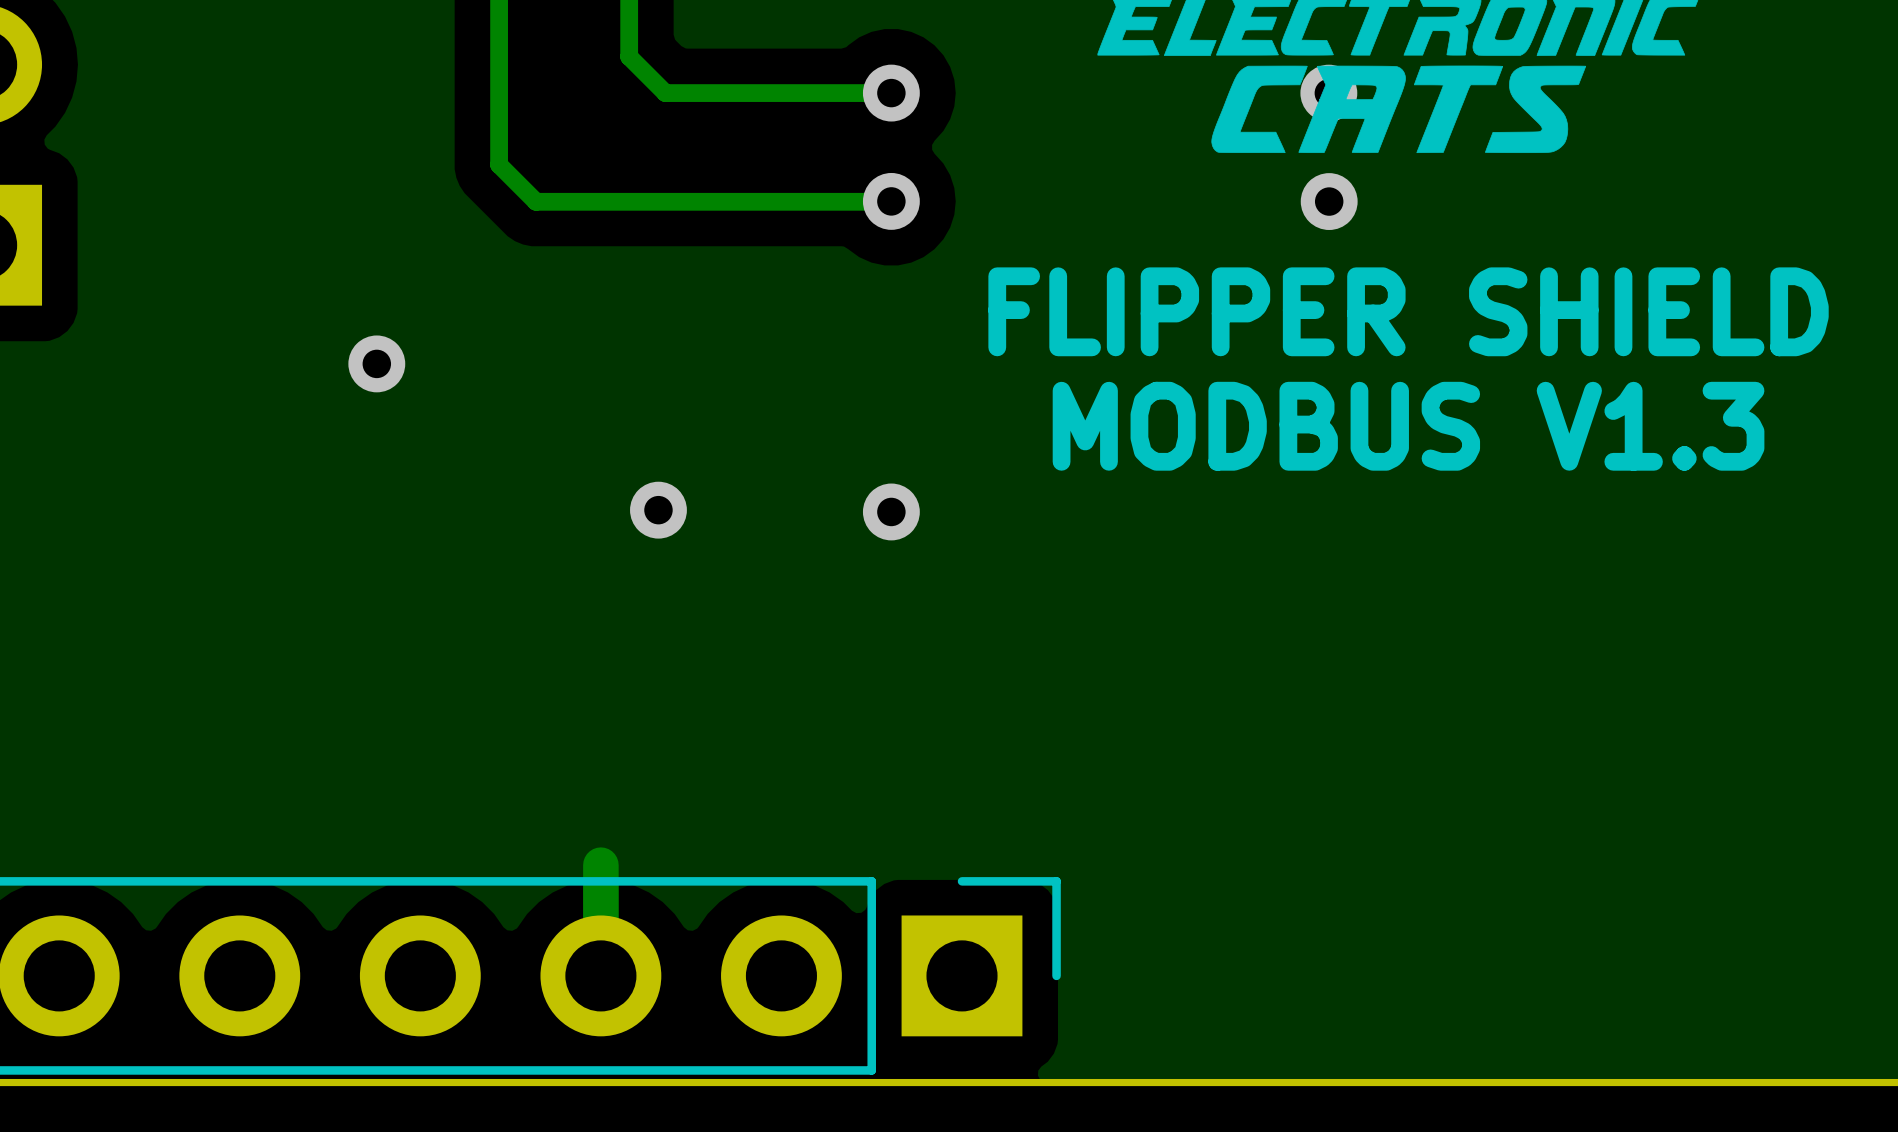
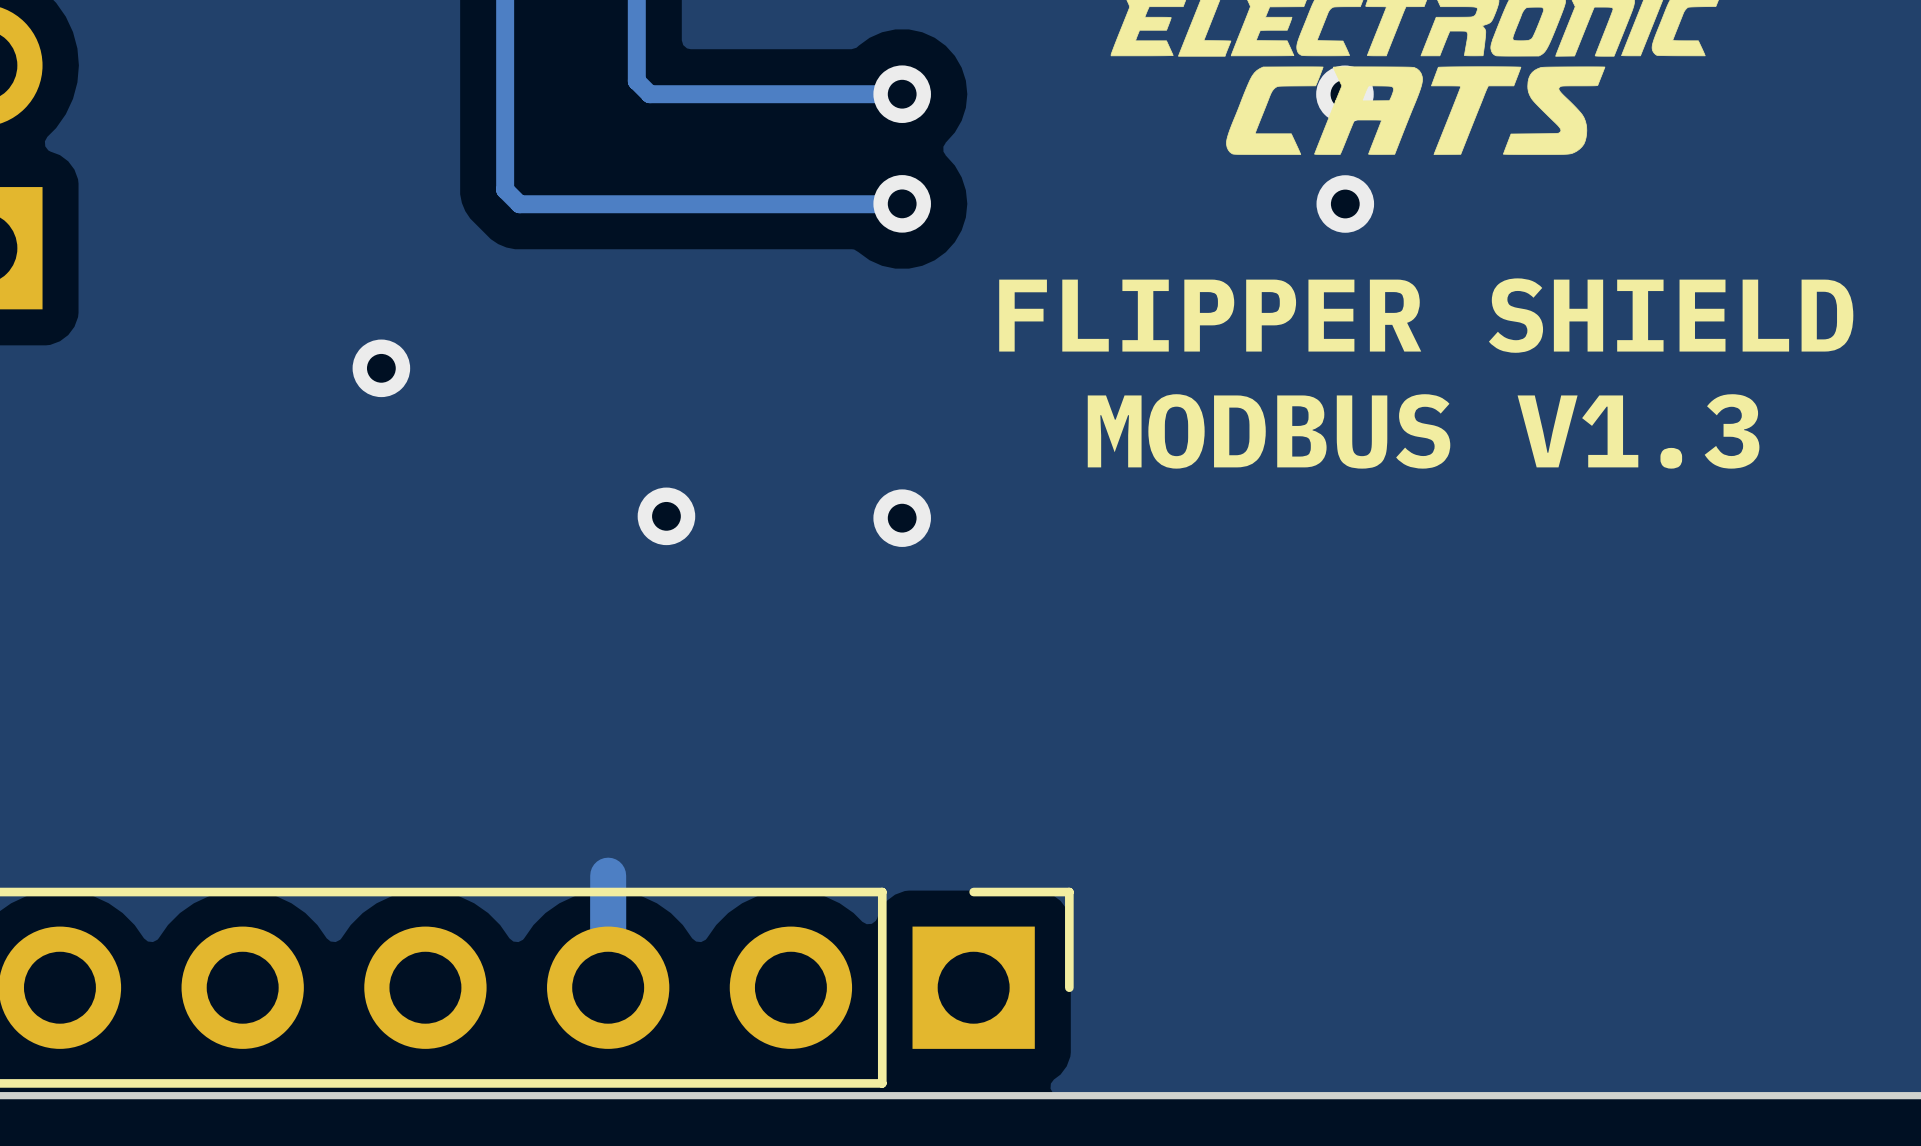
track: (629, 56) (665, 93) -> (636, 57) (636, 81) (649, 94) (673, 94)
track: (499, 164) (536, 201) -> (505, 166) (505, 189) (519, 204) (542, 204)

